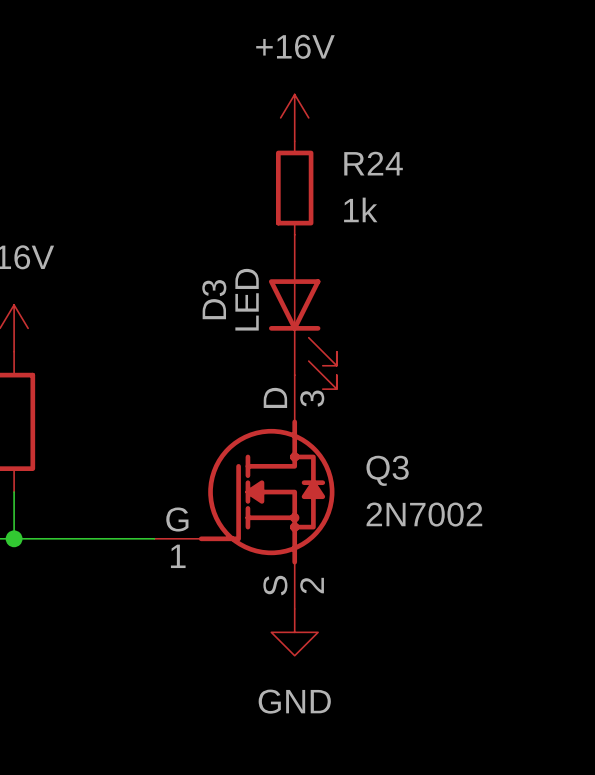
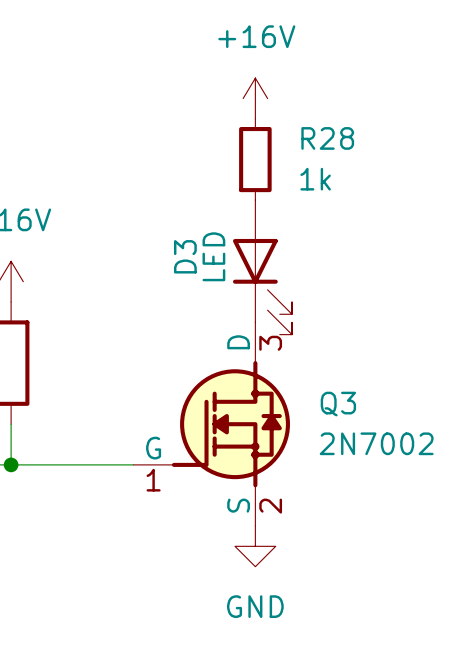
R24 name: R24 (373, 163) -> R28 (327, 138)

